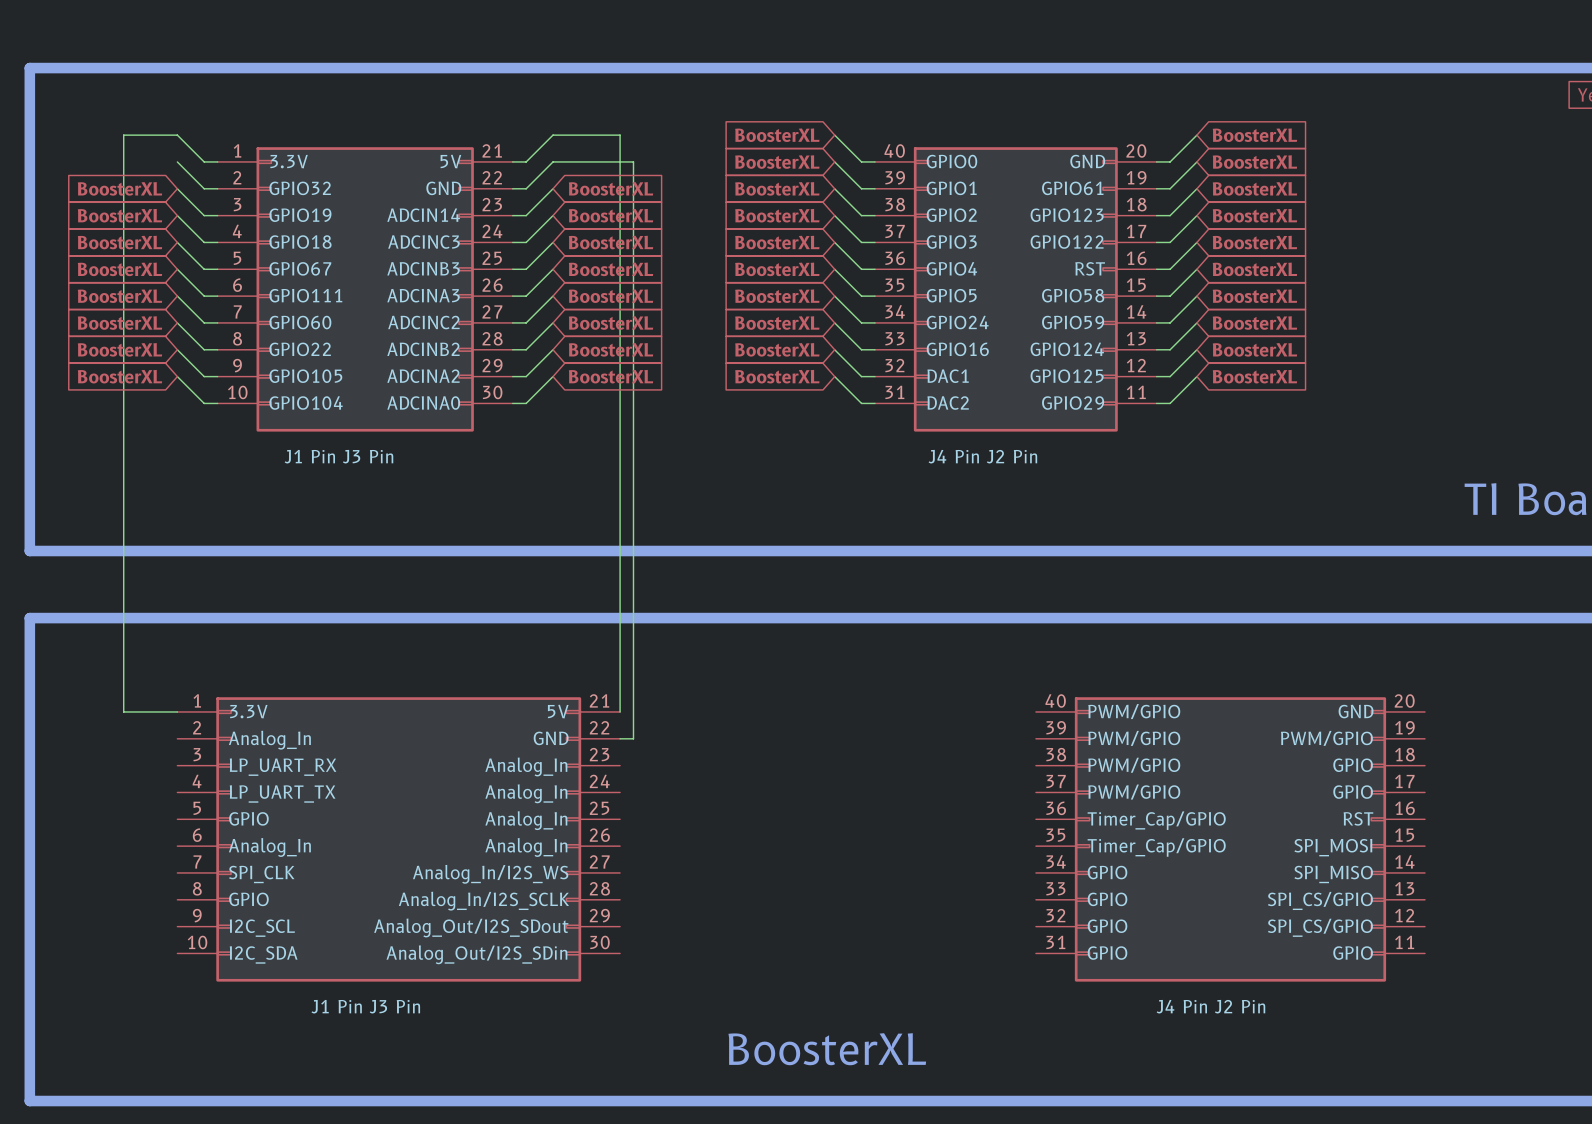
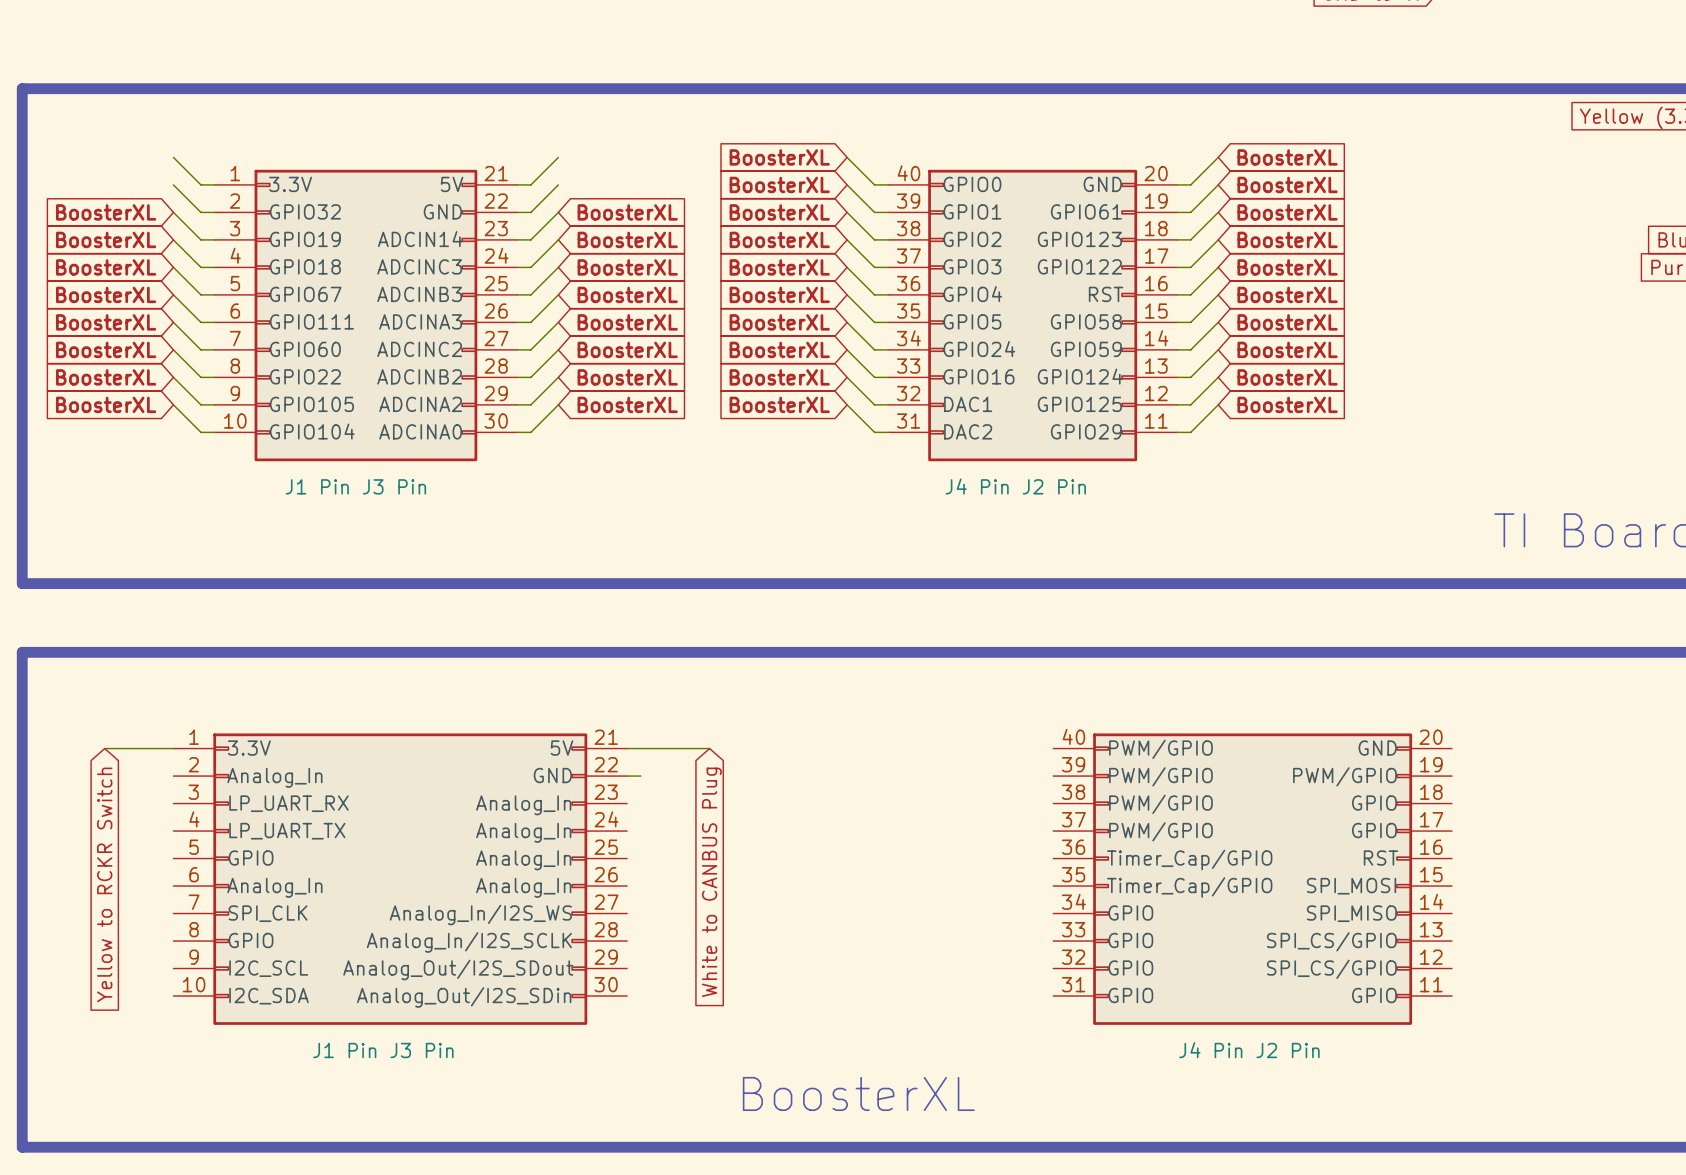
wire: (177, 135) (123, 135) (123, 711) -> (104, 748) (118, 748)
wire: (553, 135) (620, 135) (620, 711) -> (709, 748) (627, 748)
wire: (553, 161) (633, 161) (633, 738) -> none
global label: none -> Yellow to RCKR Switch (104, 884)
global label: none -> White to CANBUS Plug (711, 882)

